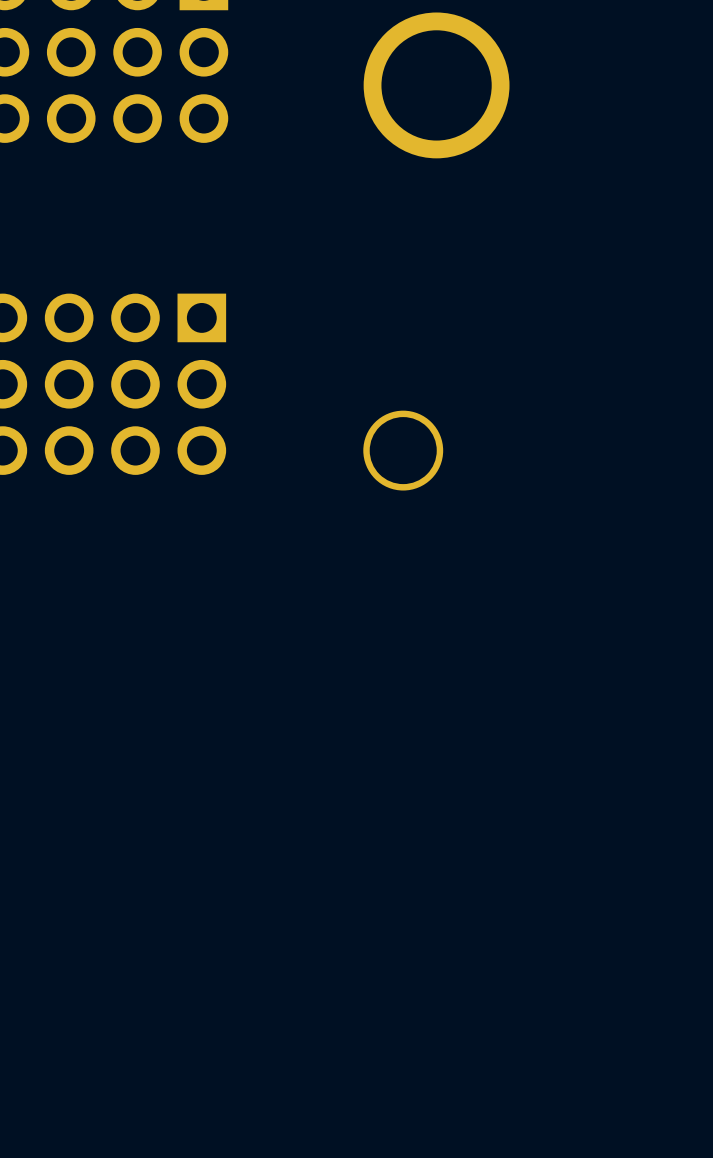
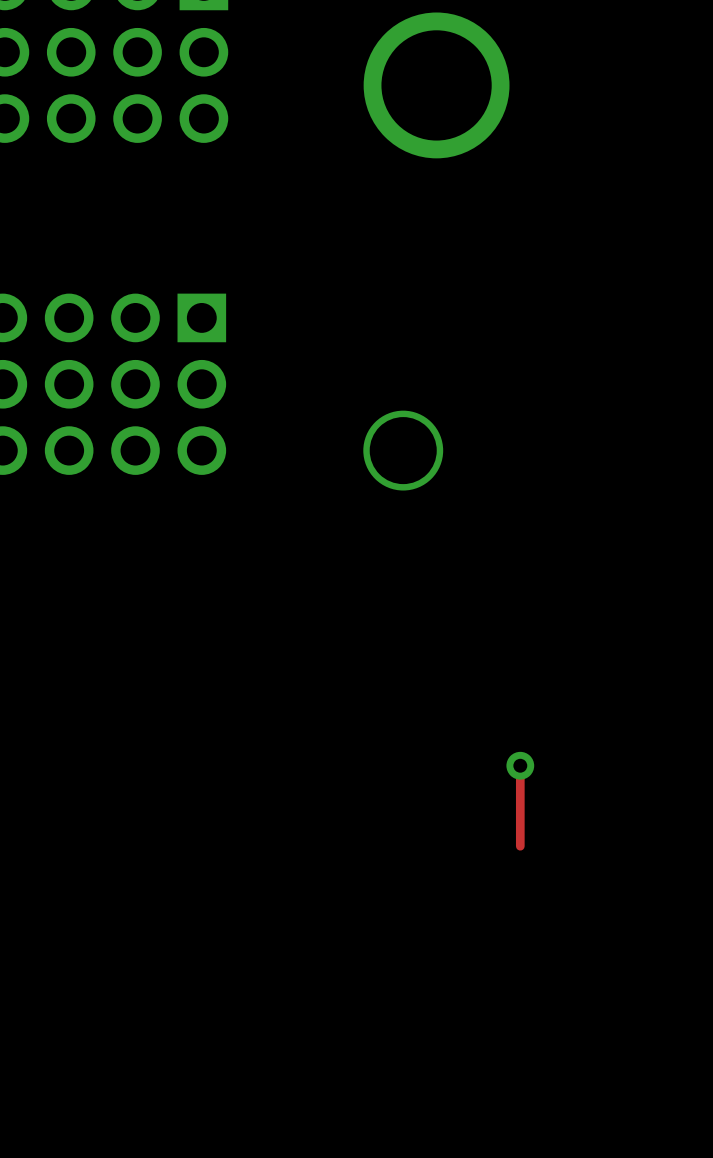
top track: none -> (520, 765) (520, 846)
via: none -> (520, 765)

